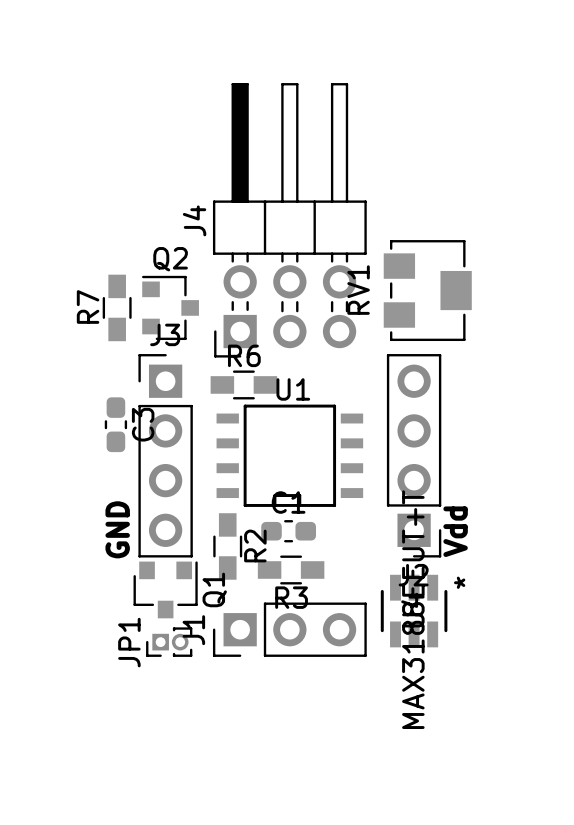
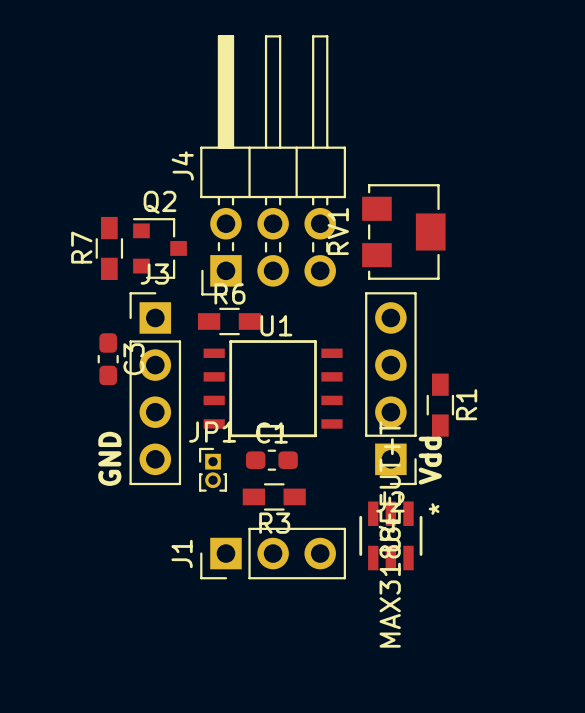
R1: none -> (440, 405)
R2: (227, 546) -> none
Q1: (165, 589) -> none
JP1 rotation: 0° (169, 642) -> 90° clockwise (213, 469)
JP1 position: (169, 642) -> (213, 469)

